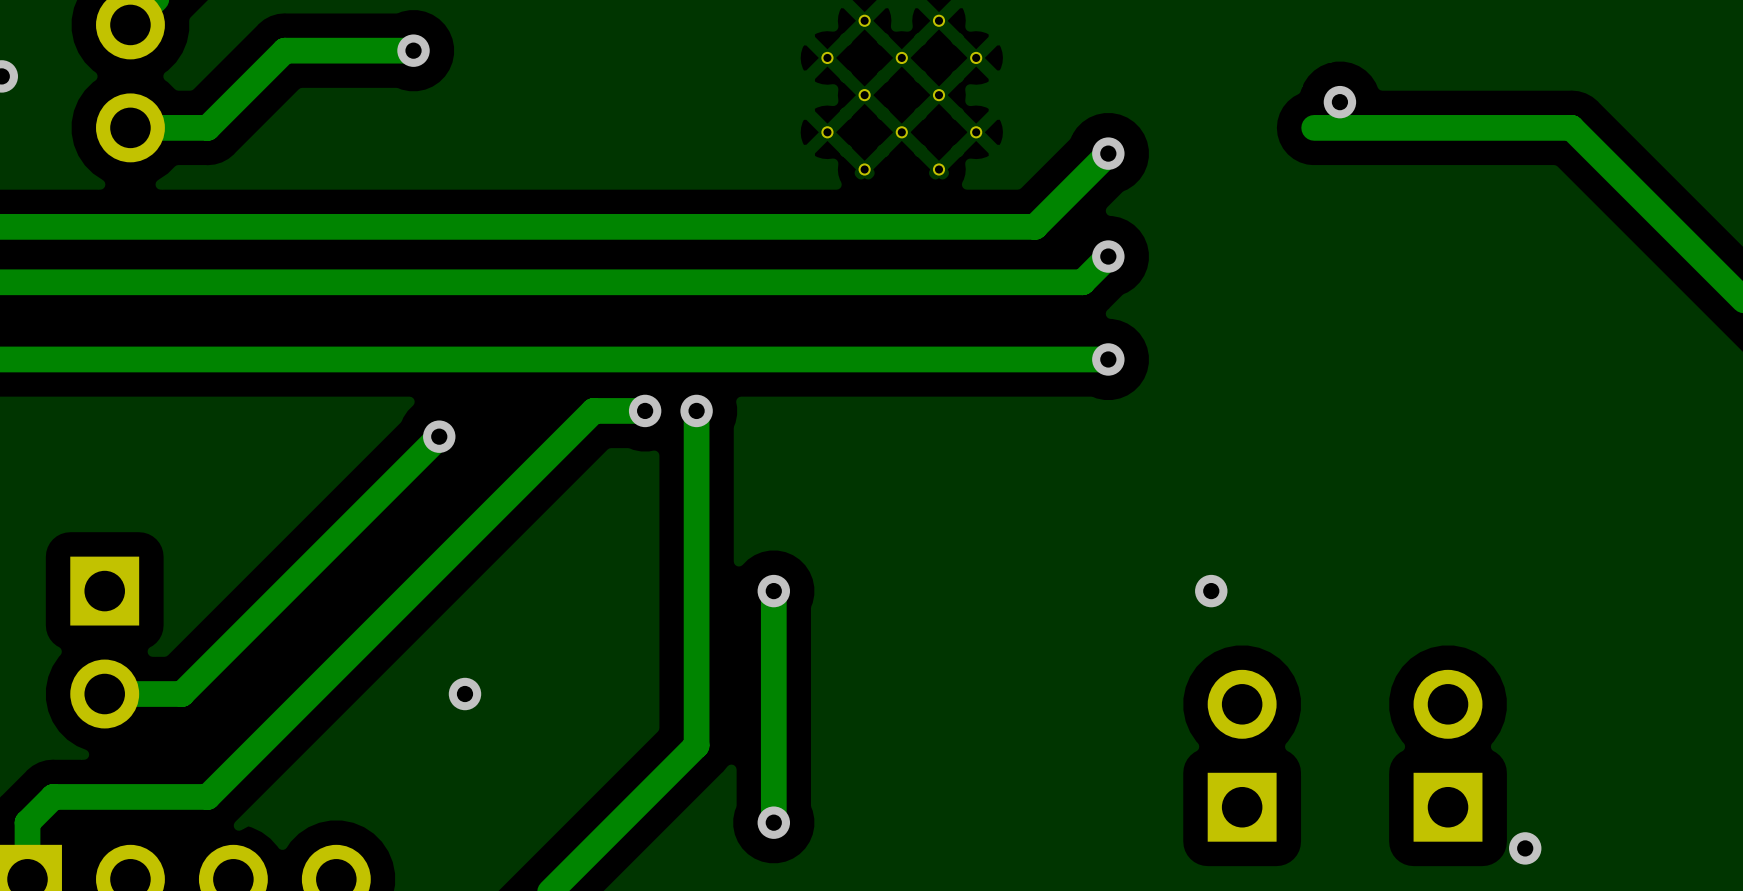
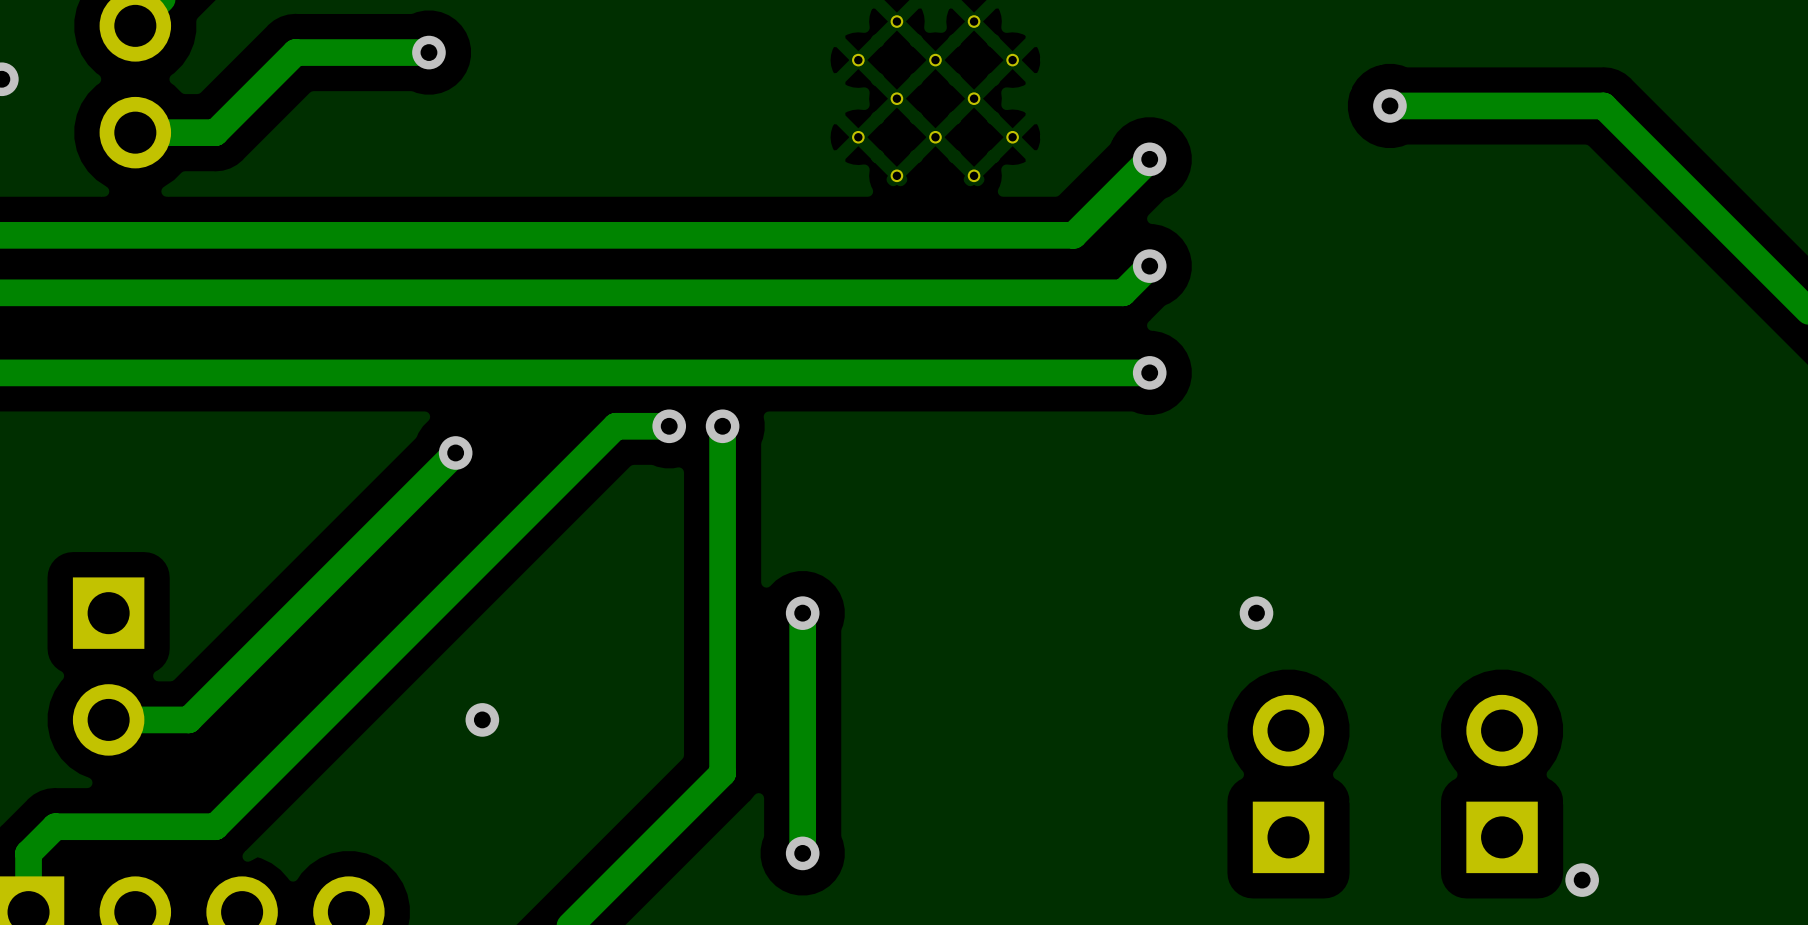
track: (1571, 127) (1314, 127) -> (1630, 132) (1603, 105) (1389, 105)

